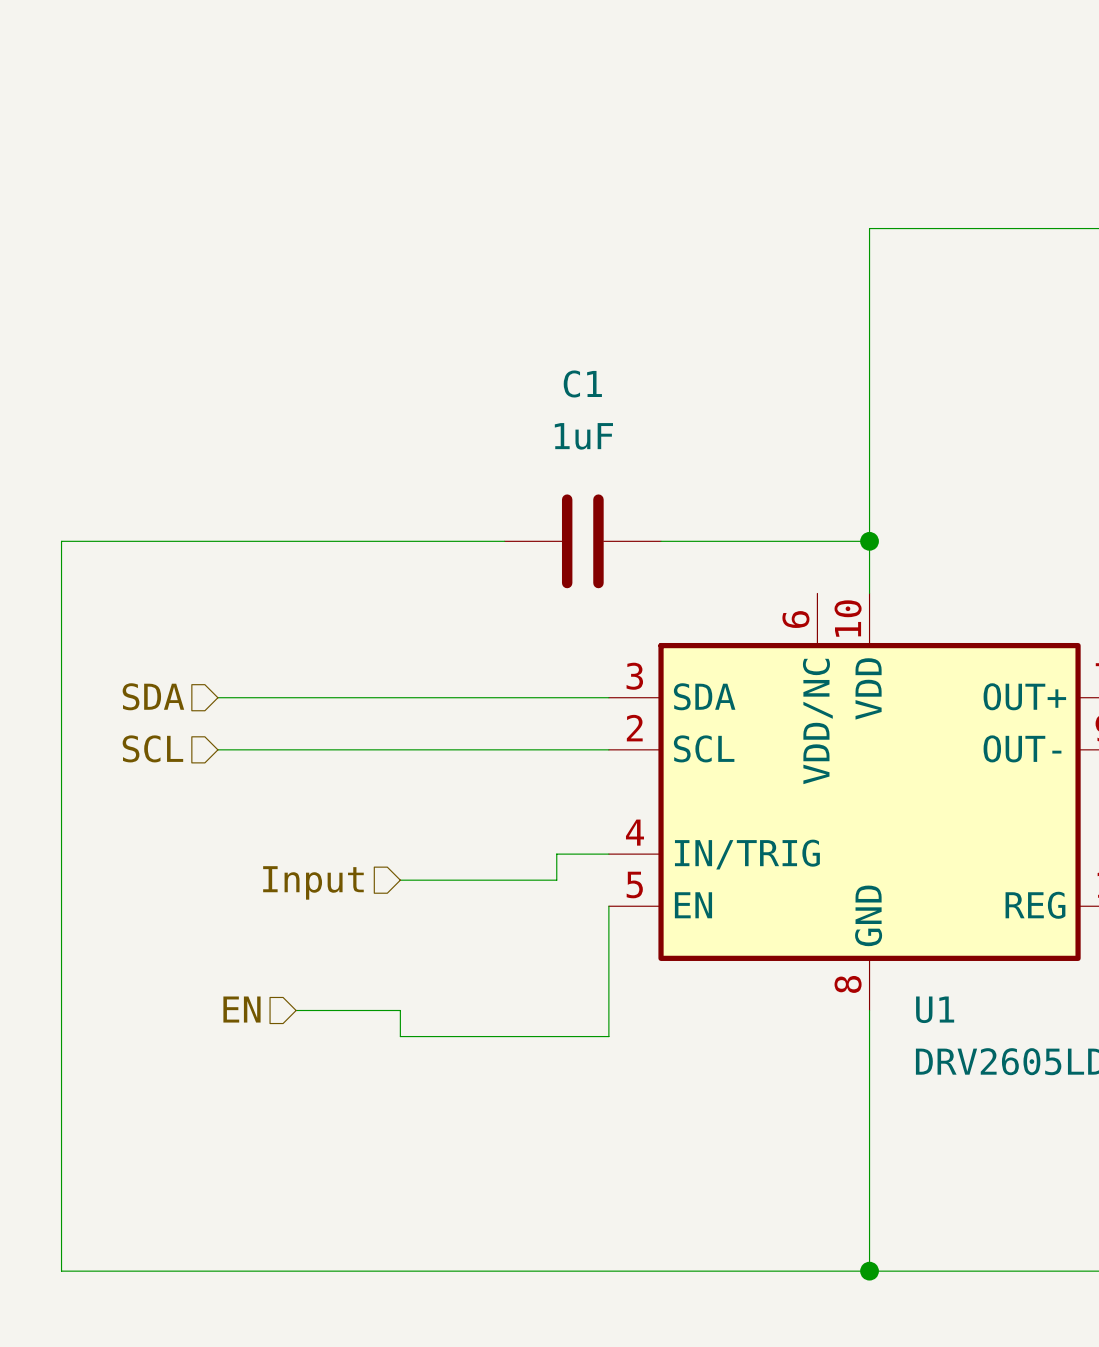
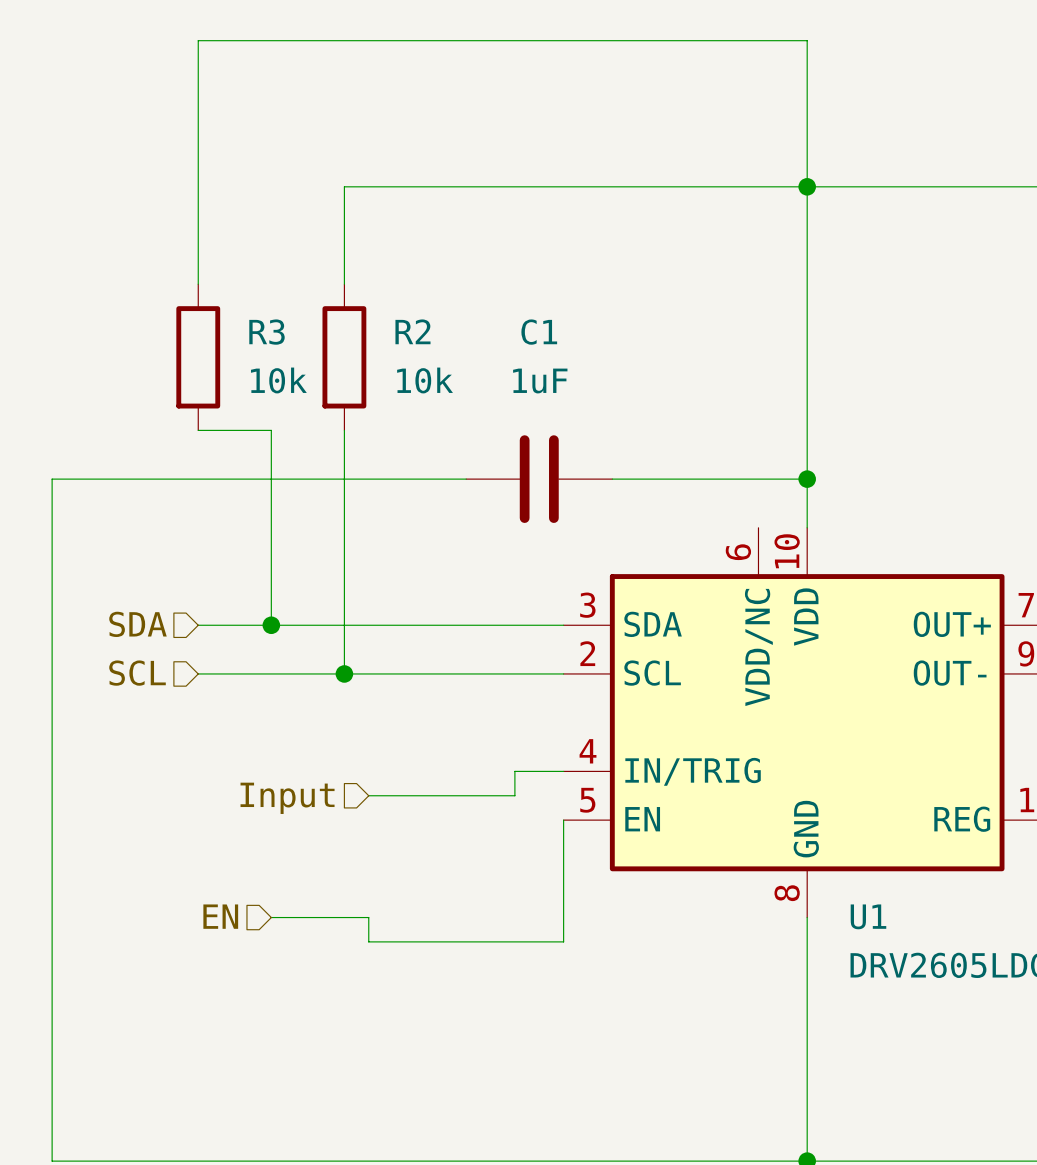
junction: none -> (807, 186)
wire: none -> (198, 284) (198, 40) (807, 40) (807, 186) (344, 186) (344, 284)
R3: none -> 10k (198, 357)
R2: none -> 10k (344, 357)
wire: none -> (198, 430) (271, 430) (271, 625)
wire: none -> (344, 430) (344, 673)
junction: none -> (271, 625)
junction: none -> (344, 673)

